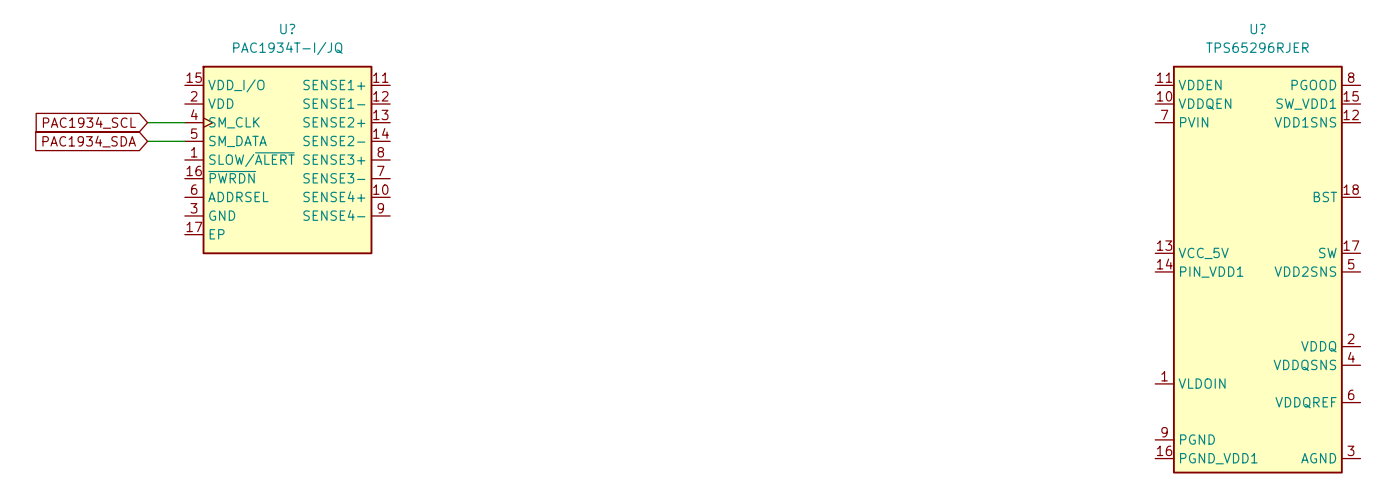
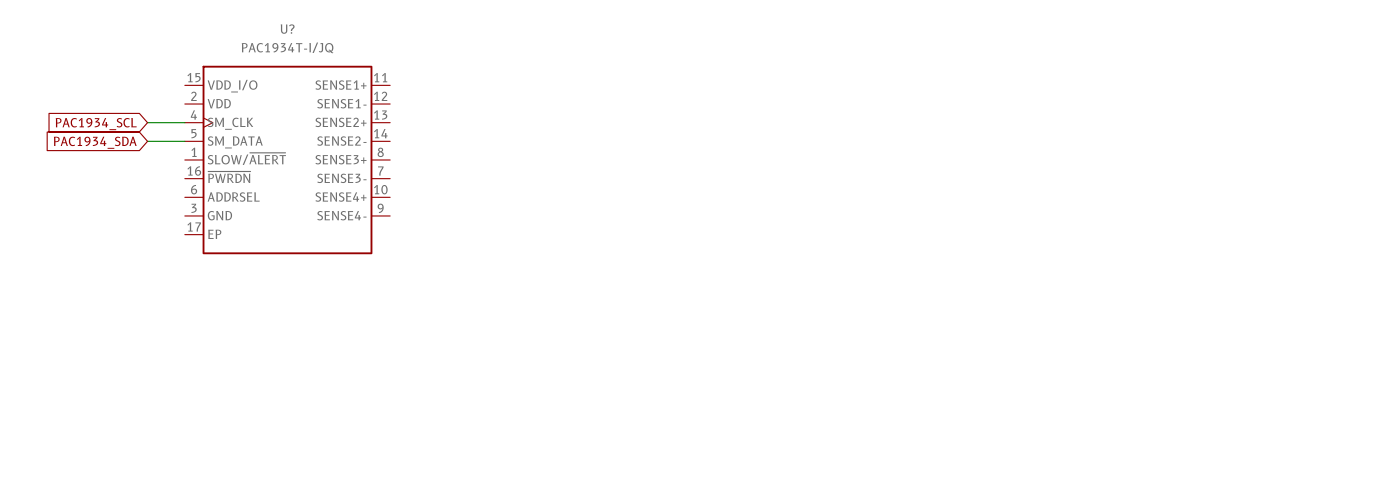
U?: (1257, 269) -> none

